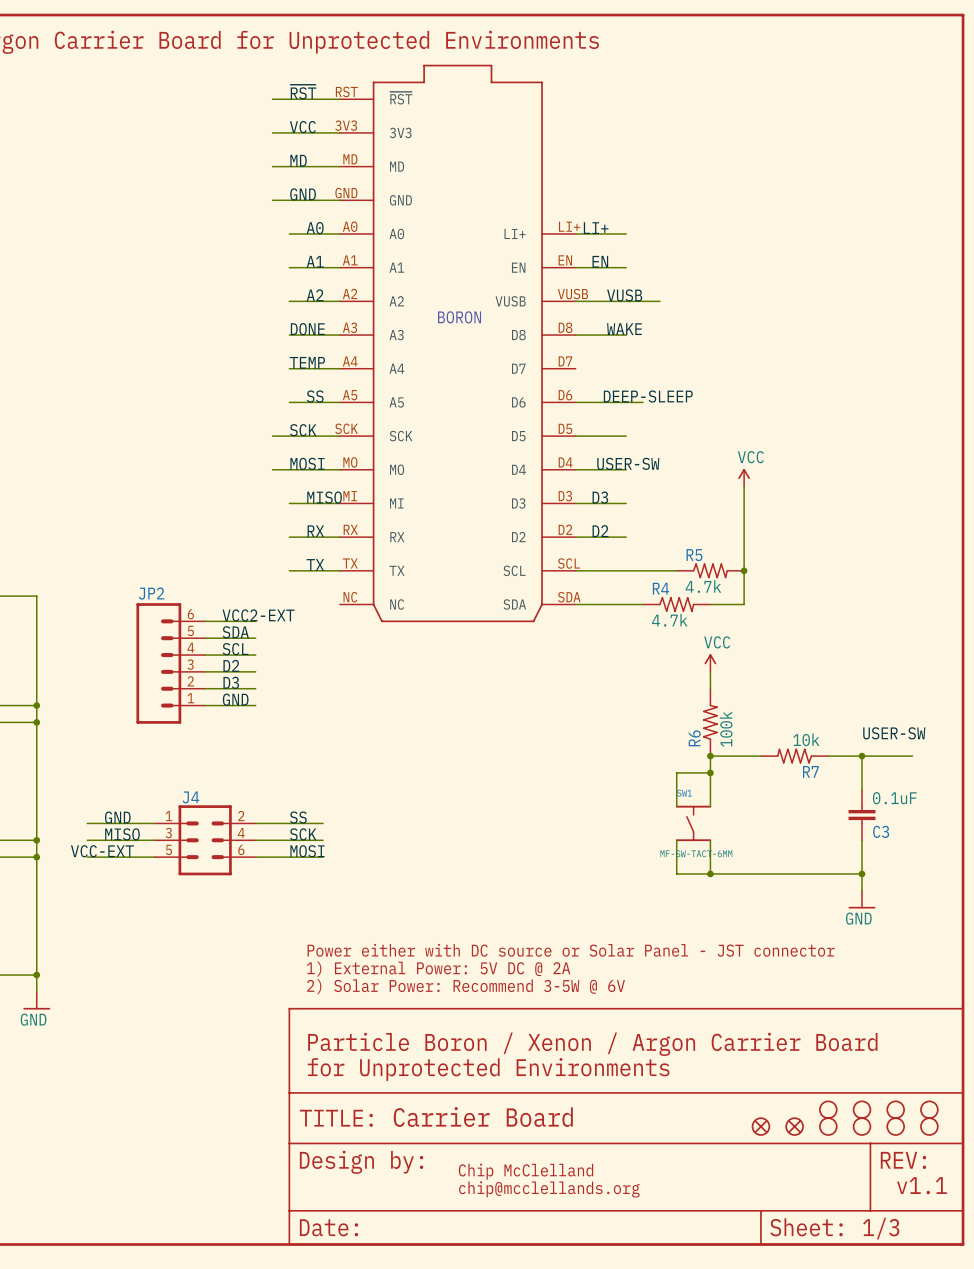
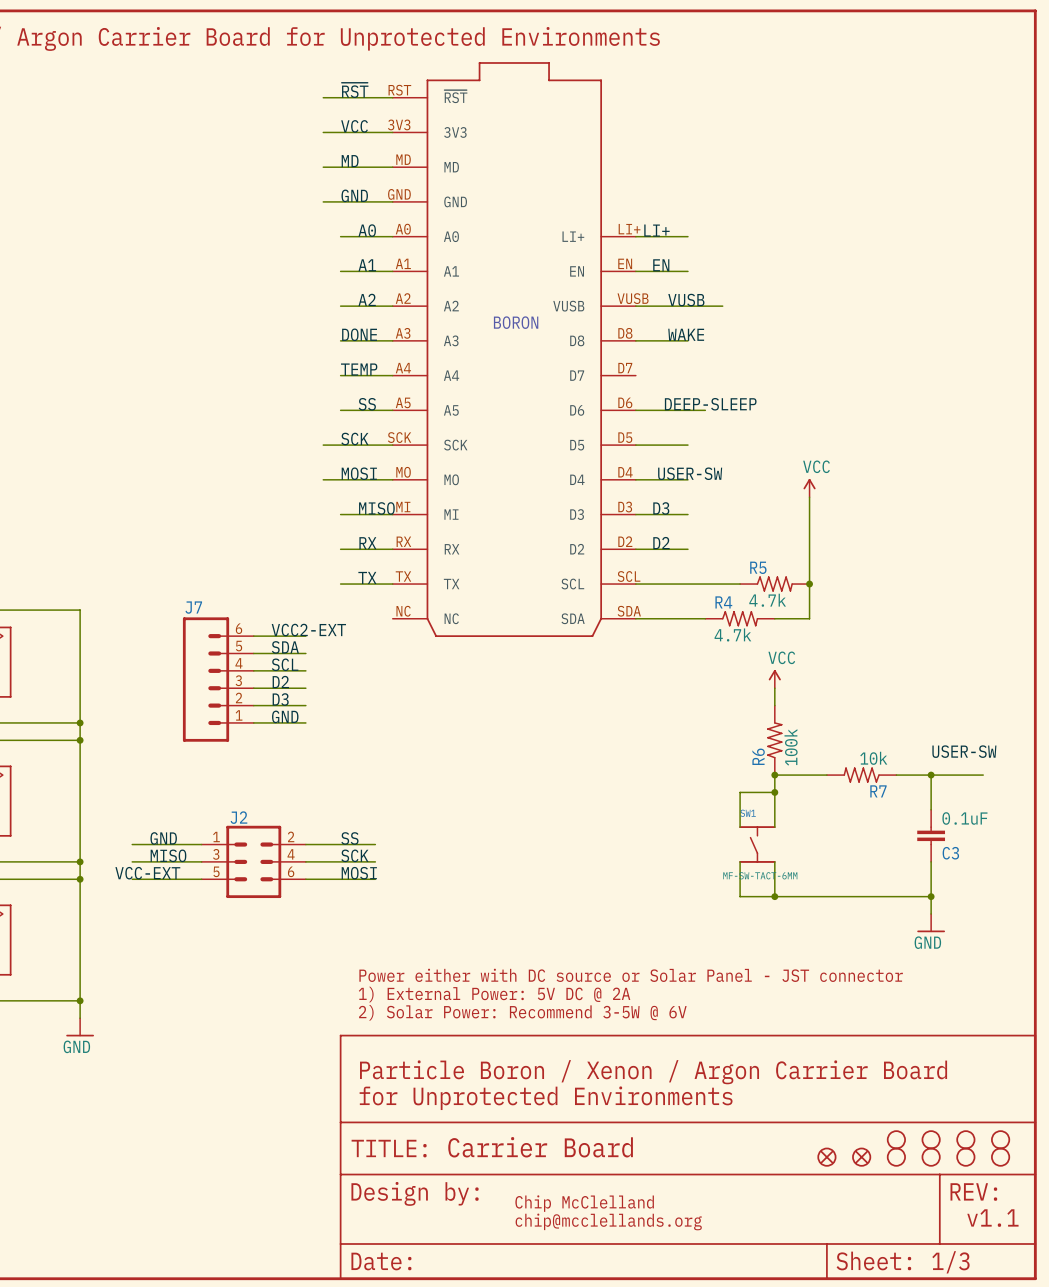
JP2 name: JP2 (151, 593) -> J7 (193, 607)
J4 name: J4 (190, 797) -> J2 (238, 817)

